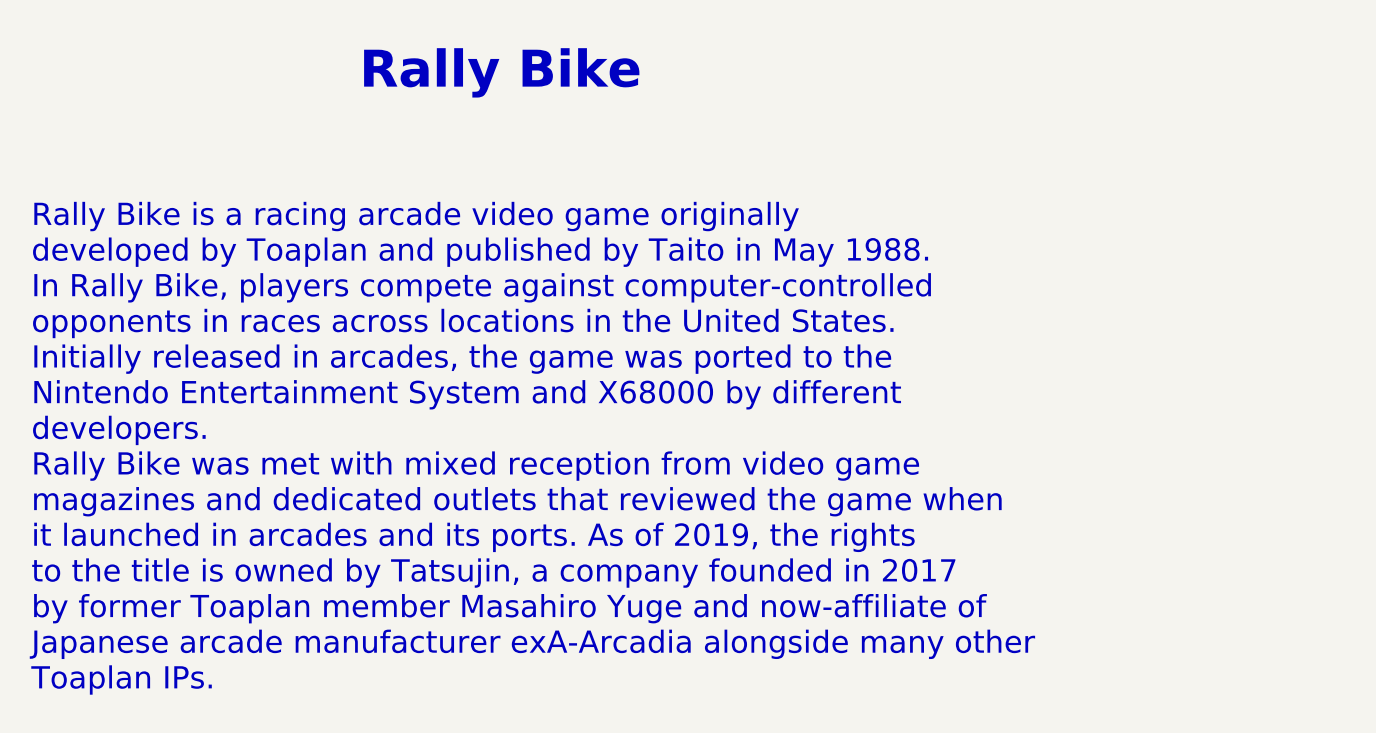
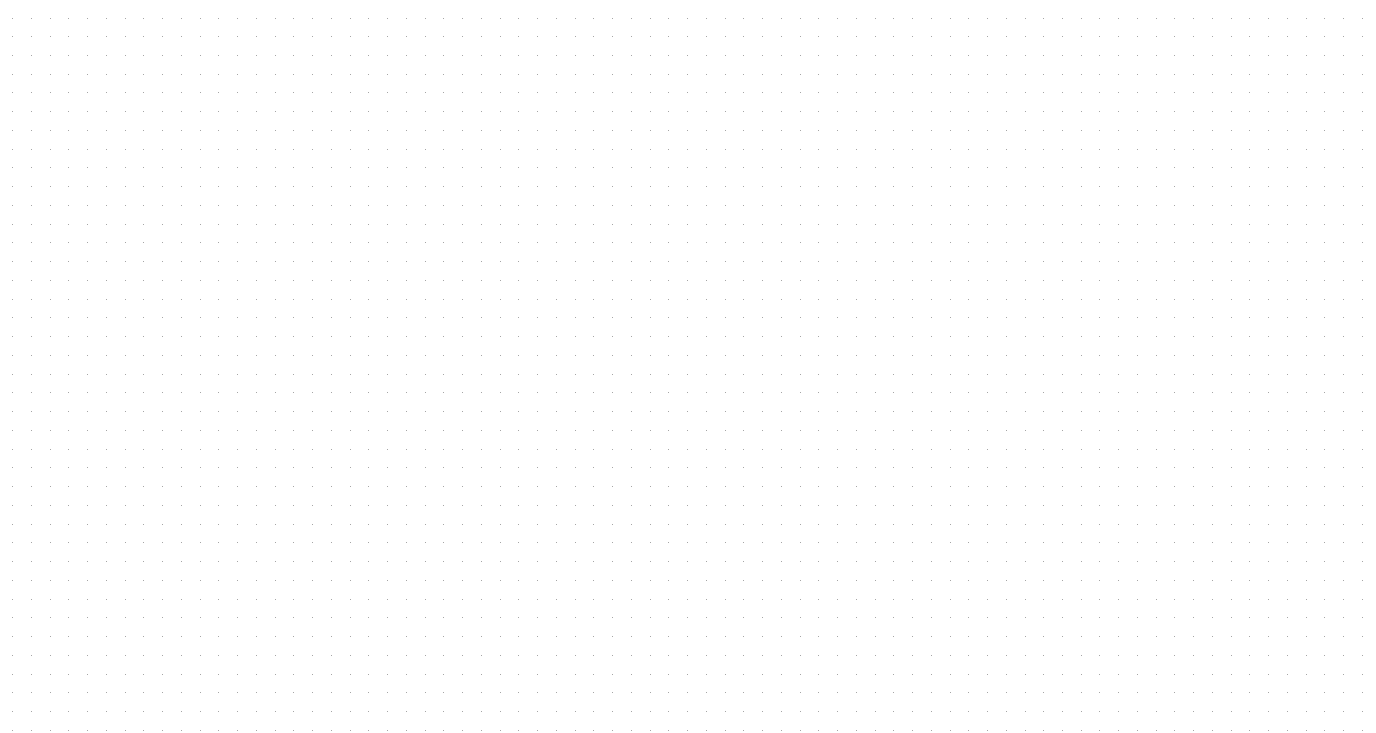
text: Rally Bike (501, 72) -> none
text: Rally Bike is a racing arcade video game originally (416, 216) -> none
text: developed by Toaplan and published by Taito in May 1988. (480, 252) -> none
text: In Rally Bike, players compete against computer-controlled (482, 287) -> none
text: opponents in races across locations in the United States. (463, 323) -> none
text: Initially released in arcades, the game was ported to the (462, 359) -> none
text: Nintendo Entertainment System and X68000 by different (467, 394) -> none
text: developers. (119, 430) -> none
text: Rally Bike was met with mixed reception from video game (476, 466) -> none
text: magazines and dedicated outlets that reviewed the game when (517, 501) -> none
text: it launched in arcades and its ports. As of 2019, the rights (474, 537) -> none
text: to the title is owned by Tatsujin, a company founded in 2017 (493, 573) -> none
text: by former Toaplan member Masahiro Yuge and now-affiliate of (510, 608) -> none
text: Japanese arcade manufacturer exA-Arcadia alongside many other (532, 644) -> none
text: Toaplan IPs. (121, 679) -> none

